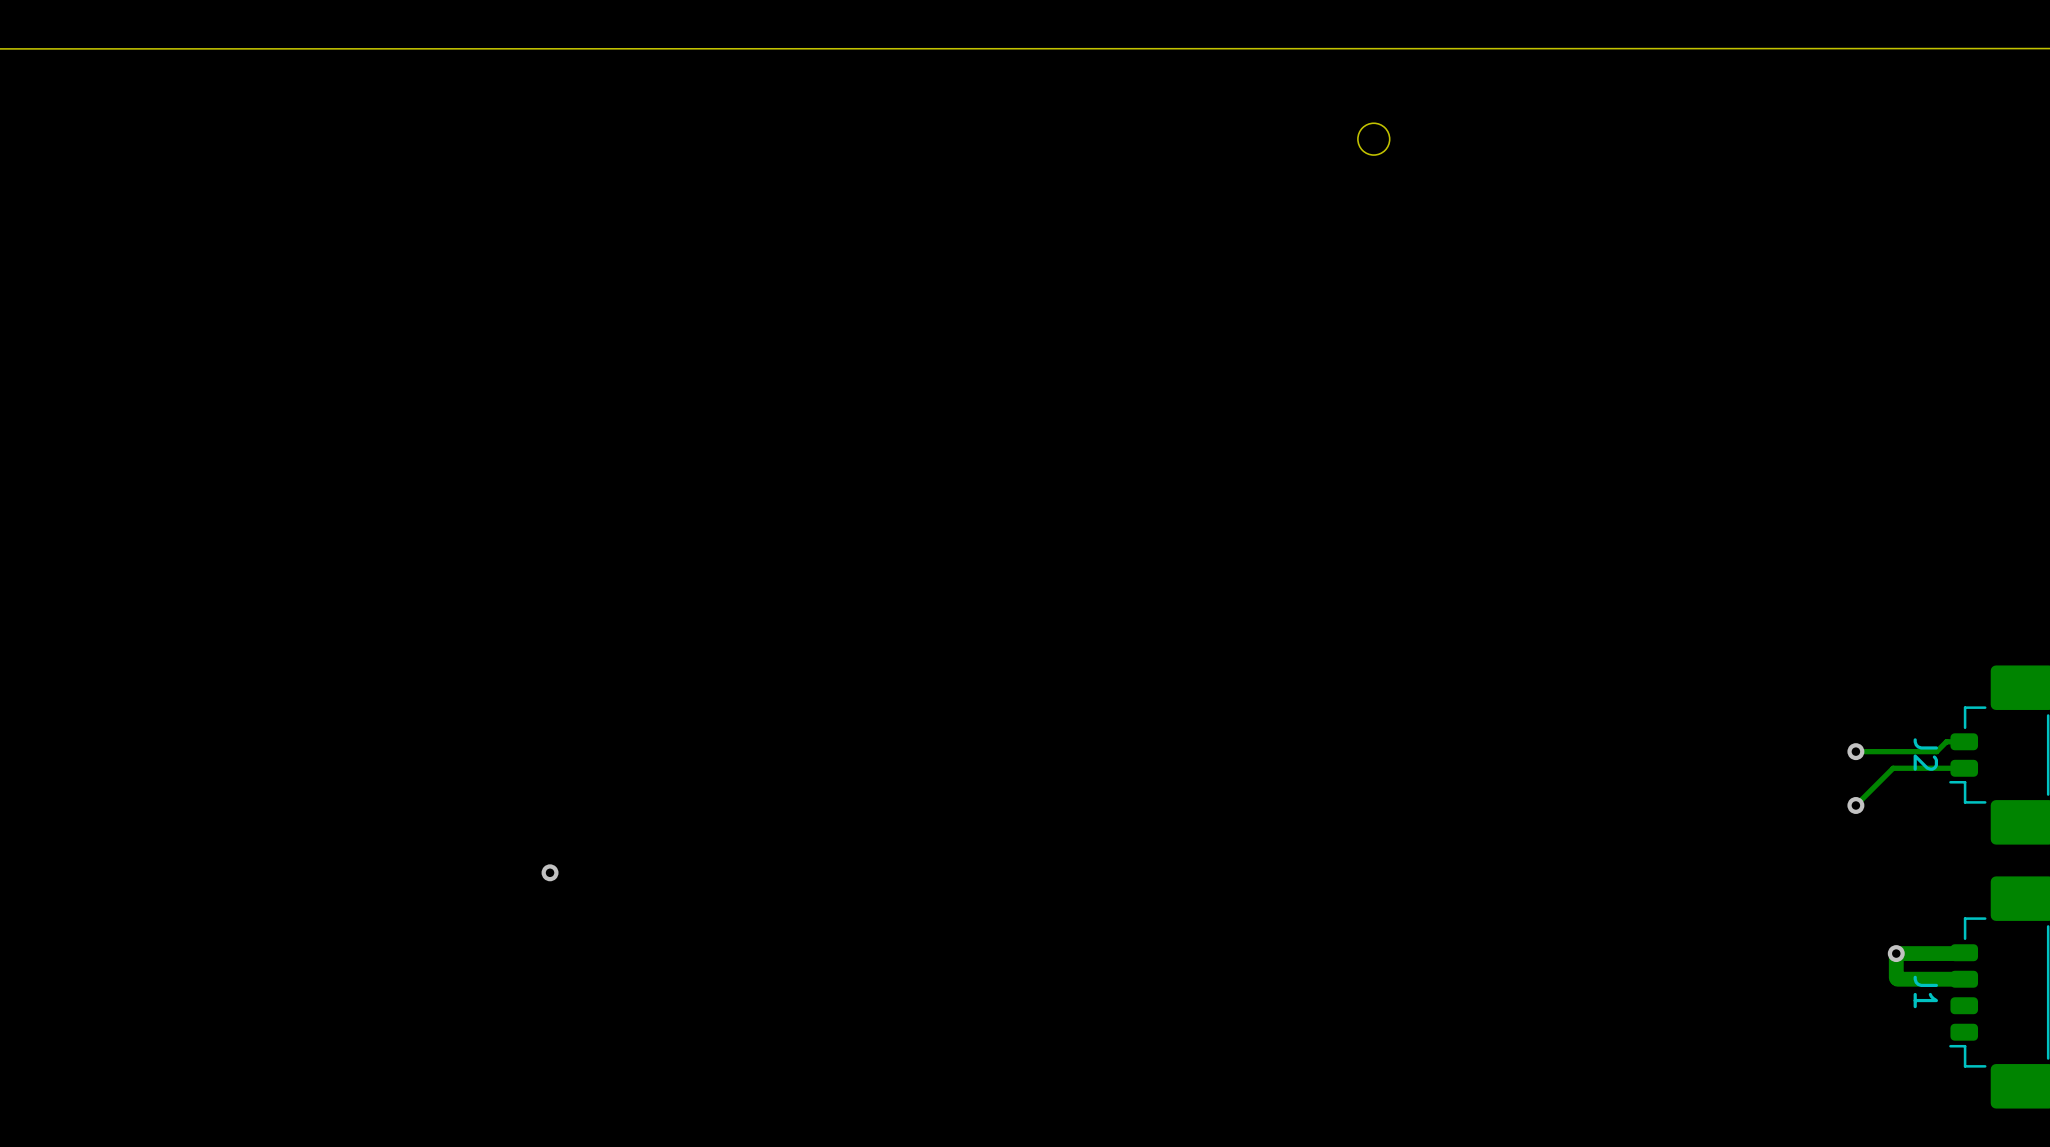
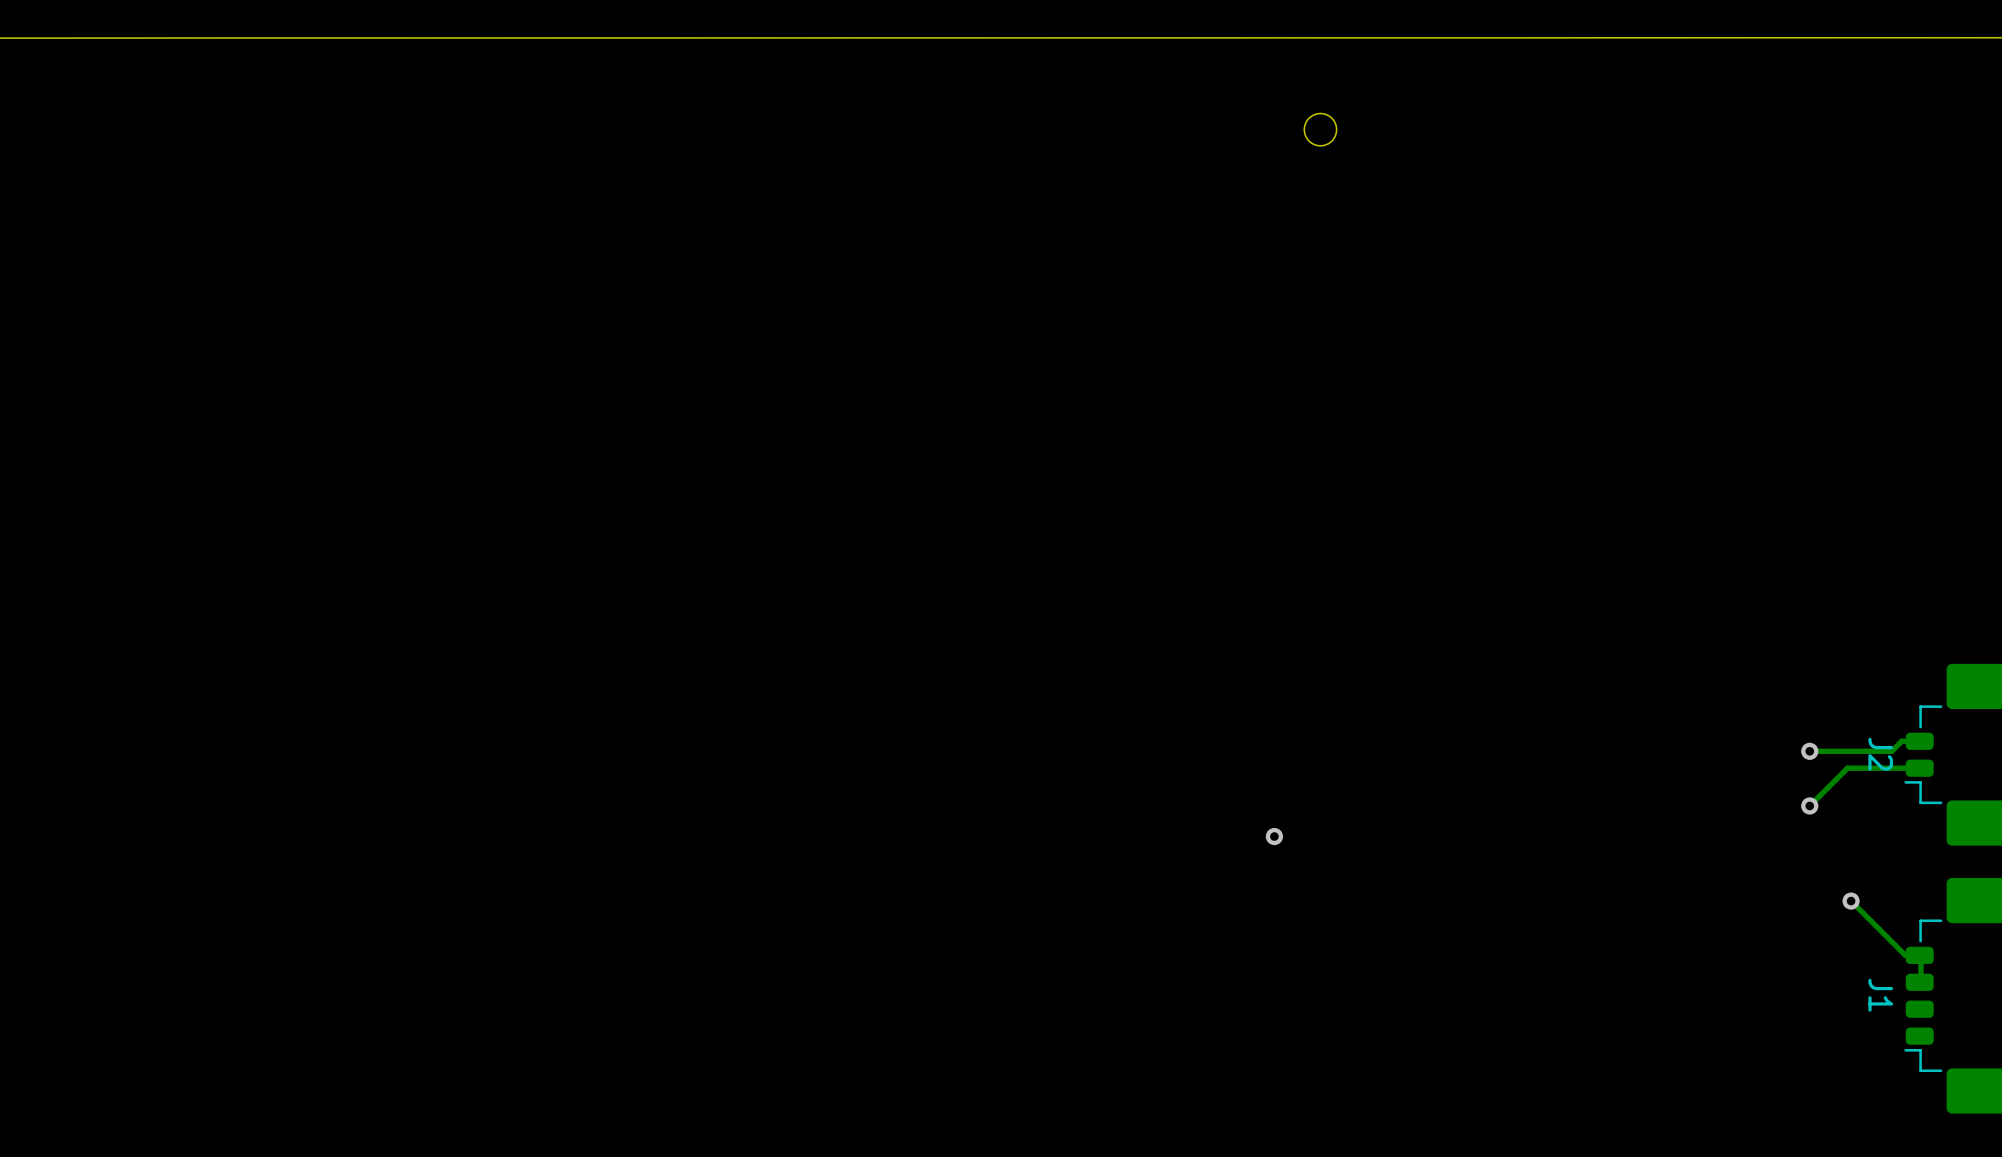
via: none -> (1274, 836)
via: (550, 872) -> none
track: none -> (1851, 901) (1905, 955) (1921, 955) (1921, 982)
track: (1964, 952) (1896, 953) (1897, 979) (1964, 979) -> none
via position: (1896, 953) -> (1851, 901)

